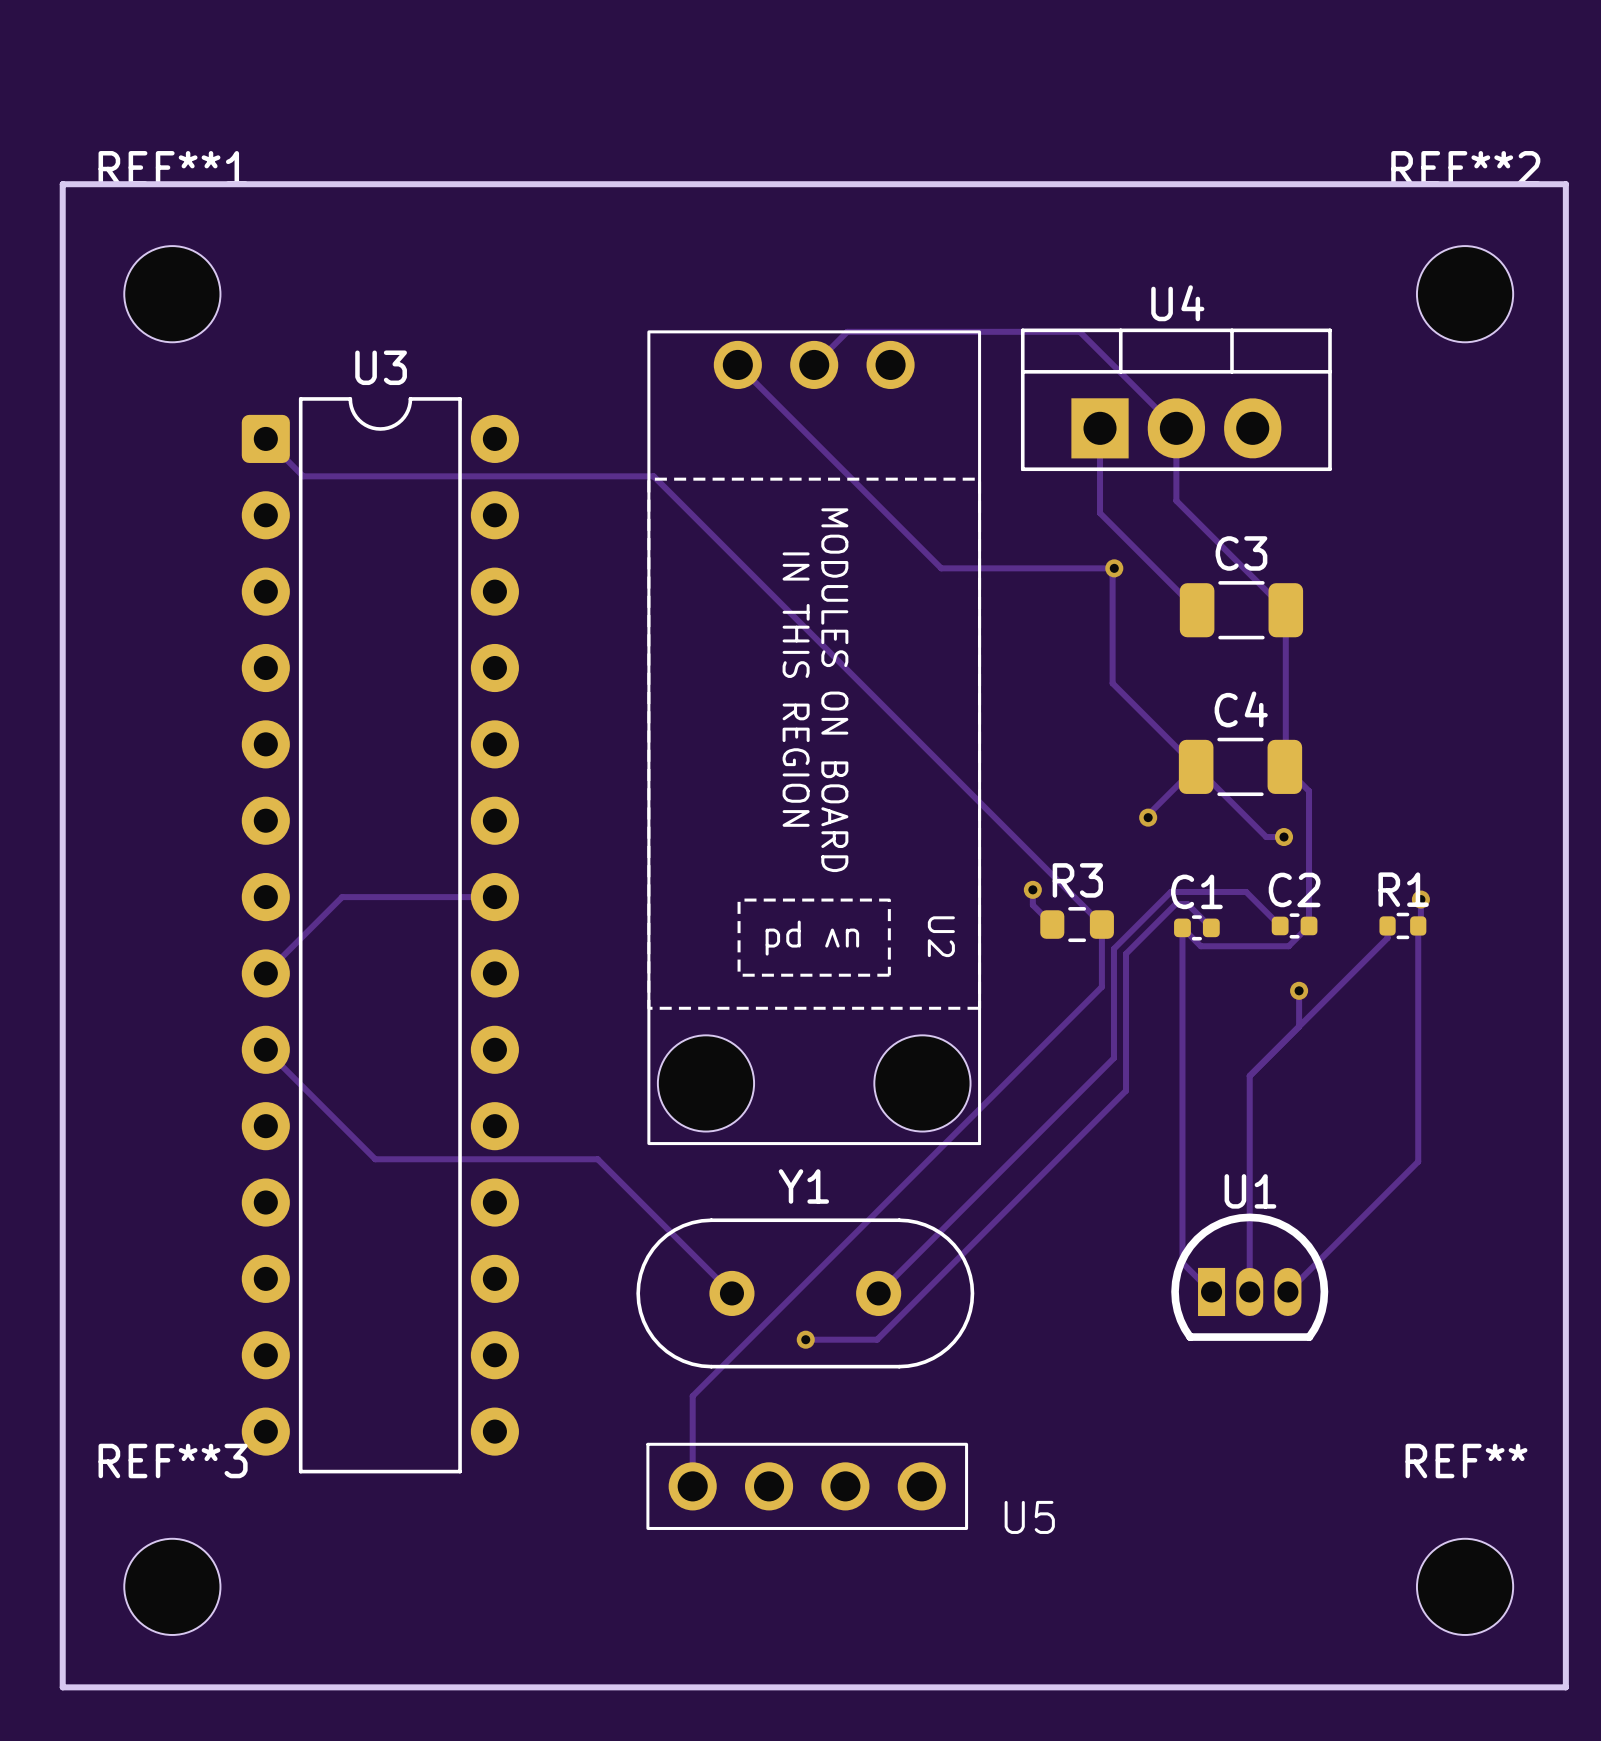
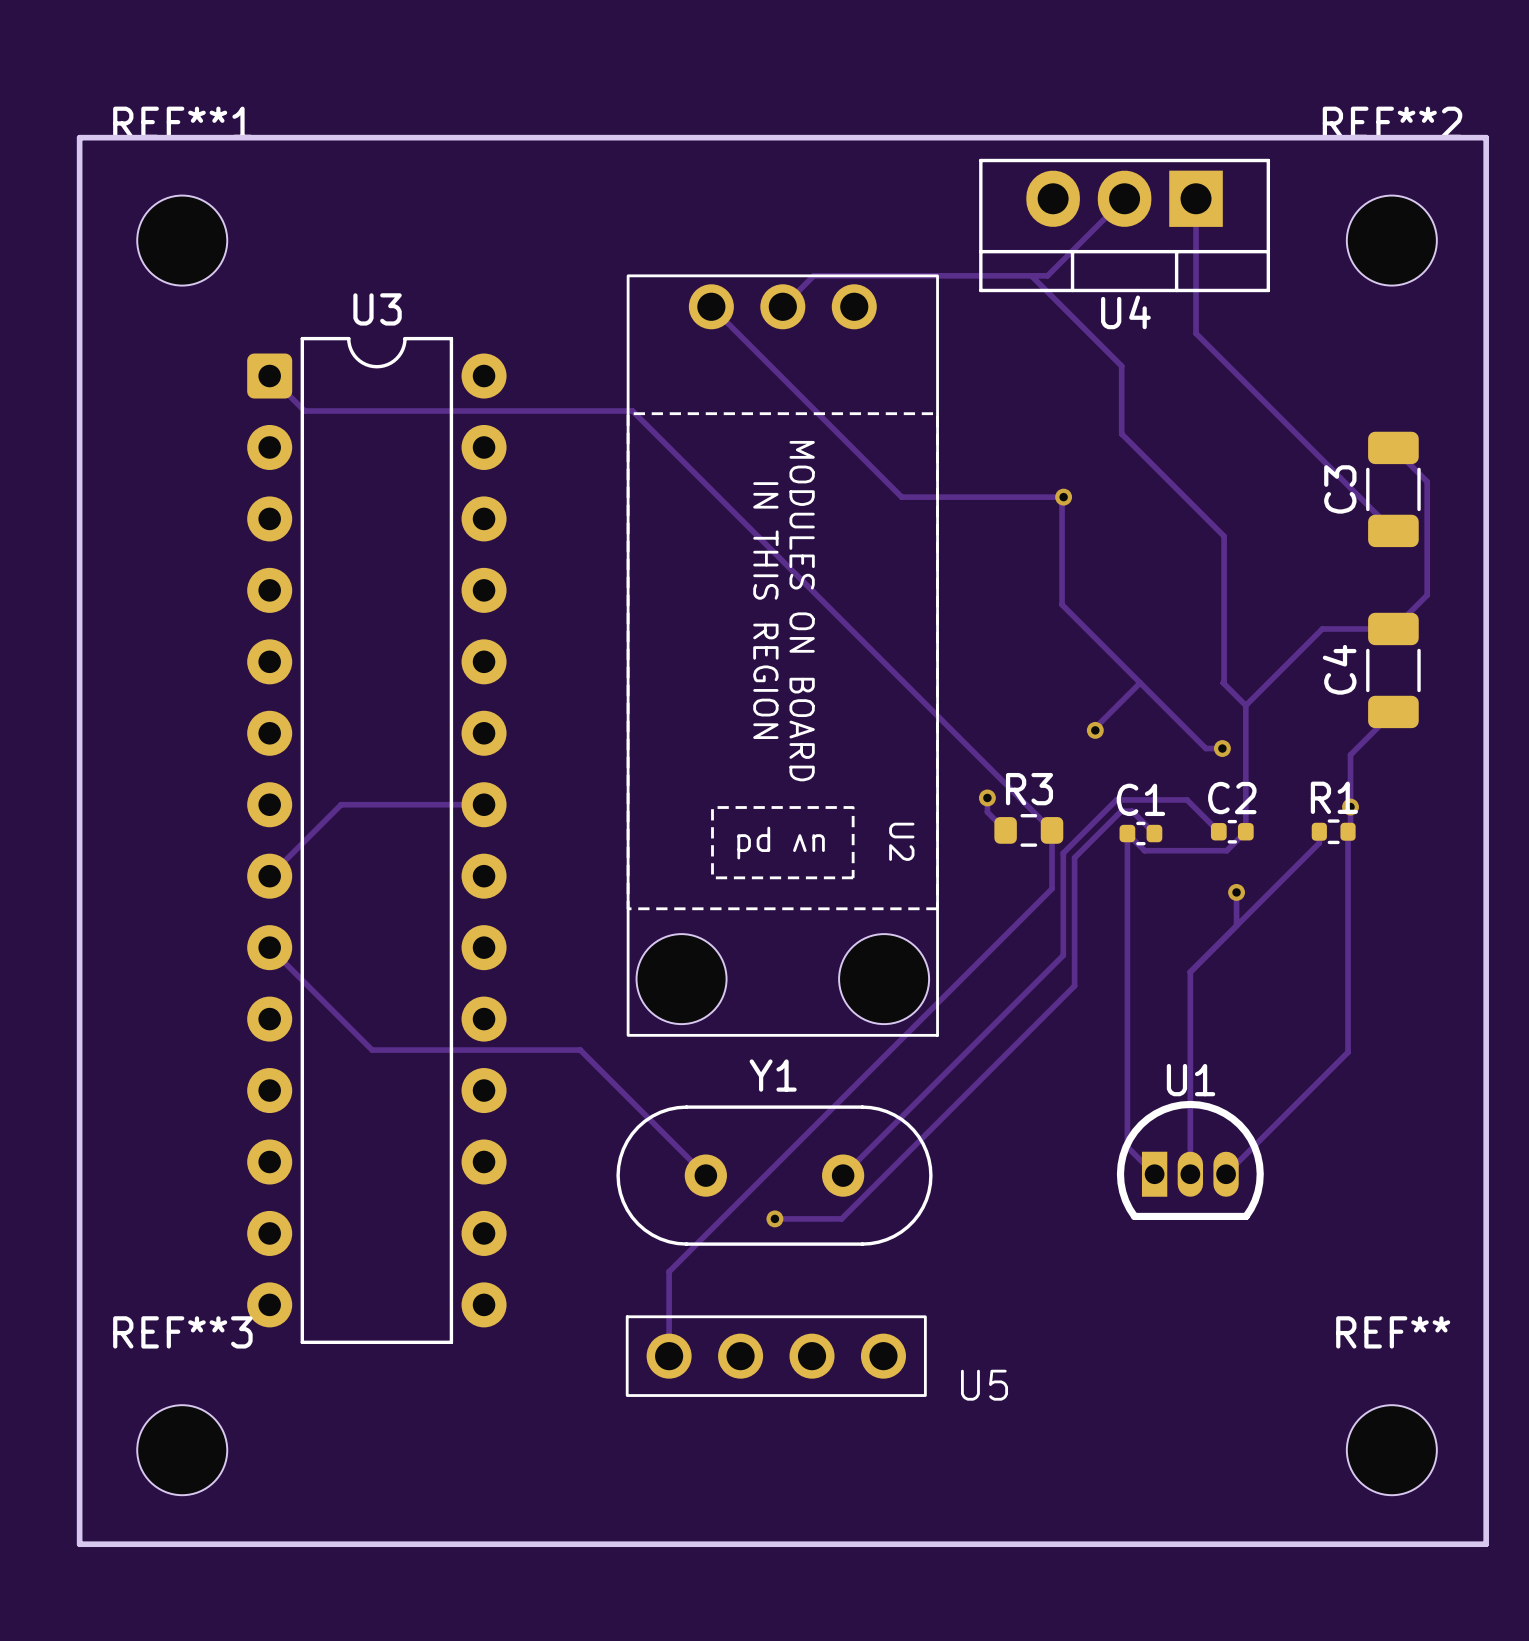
track: none -> (1124, 198) (1047, 275) (1031, 275)
track: none -> (1196, 198) (1196, 333) (1393, 530)
U4 rotation: 0° (1176, 399) -> 180° (1124, 225)
track: (1100, 428) (1100, 513) (1197, 610) -> none
track: none -> (1393, 447) (1427, 481) (1427, 595) (1393, 628) (1322, 628) (1245, 705)
C3 name position: C3 (1241, 553) -> C3 (1340, 489)
C3 rotation: 0° (1241, 610) -> 90° clockwise (1393, 489)
C3 position: (1241, 610) -> (1393, 489)
C4 name position: C4 (1241, 709) -> C4 (1339, 669)
C4 rotation: 0° (1240, 766) -> 90° clockwise (1393, 670)
C4 position: (1240, 766) -> (1393, 670)
track: none -> (1393, 711) (1350, 754) (1350, 807)

